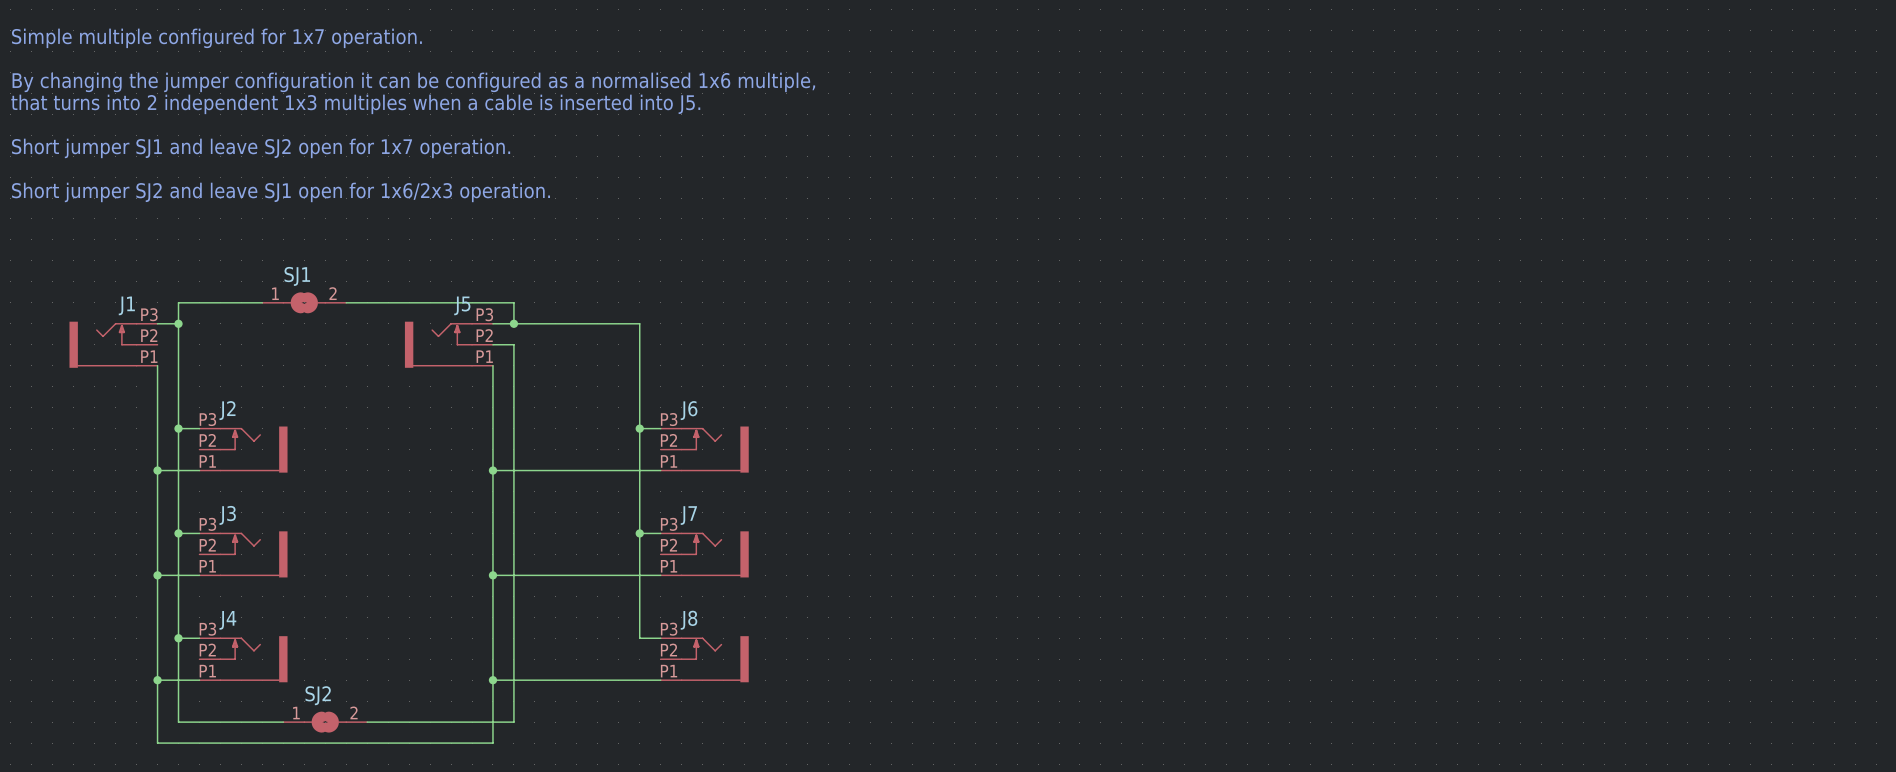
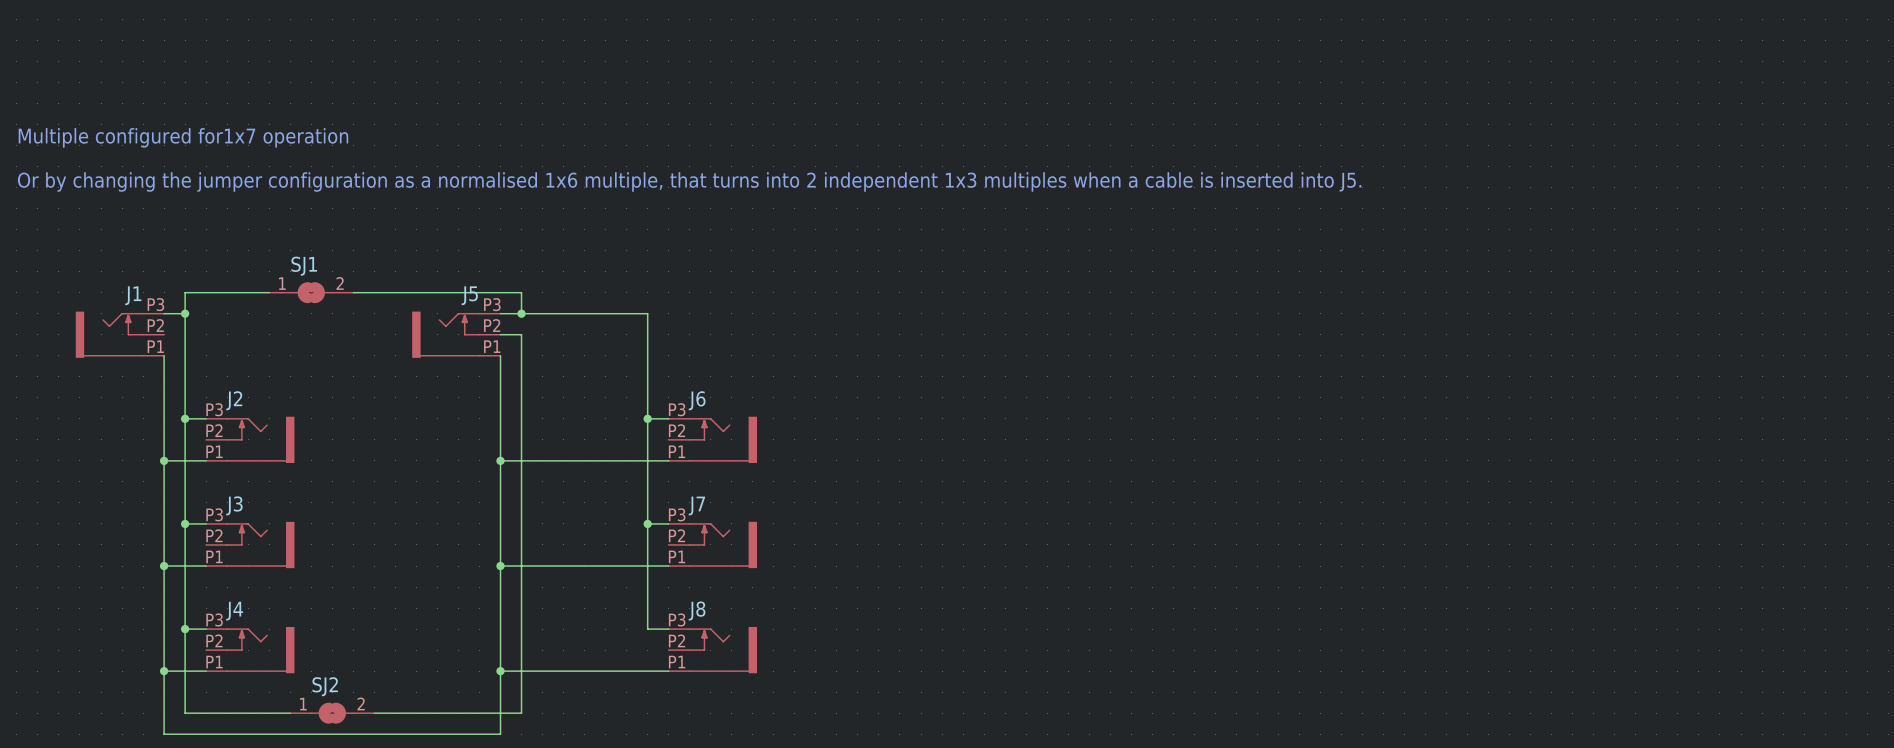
text: Simple multiple configured for 1x7 operation. (216, 38) -> none
text: By changing the jumper configuration it can be configured as a normalised 1x6 multiple, (413, 82) -> none
text: that turns into 2 independent 1x3 multiples when a cable is inserted into J5. (355, 104) -> none
text: Short jumper SJ1 and leave SJ2 open for 1x7 operation. (261, 148) -> Multiple configured for1x7 operation (183, 137)
text: Short jumper SJ2 and leave SJ1 open for 1x6/2x3 operation. (280, 192) -> Or by changing the jumper configuration as a normalised 1x6 multiple, that turns into 2 independent 1x3 multiples when a cable is inserted into J5. (689, 181)

